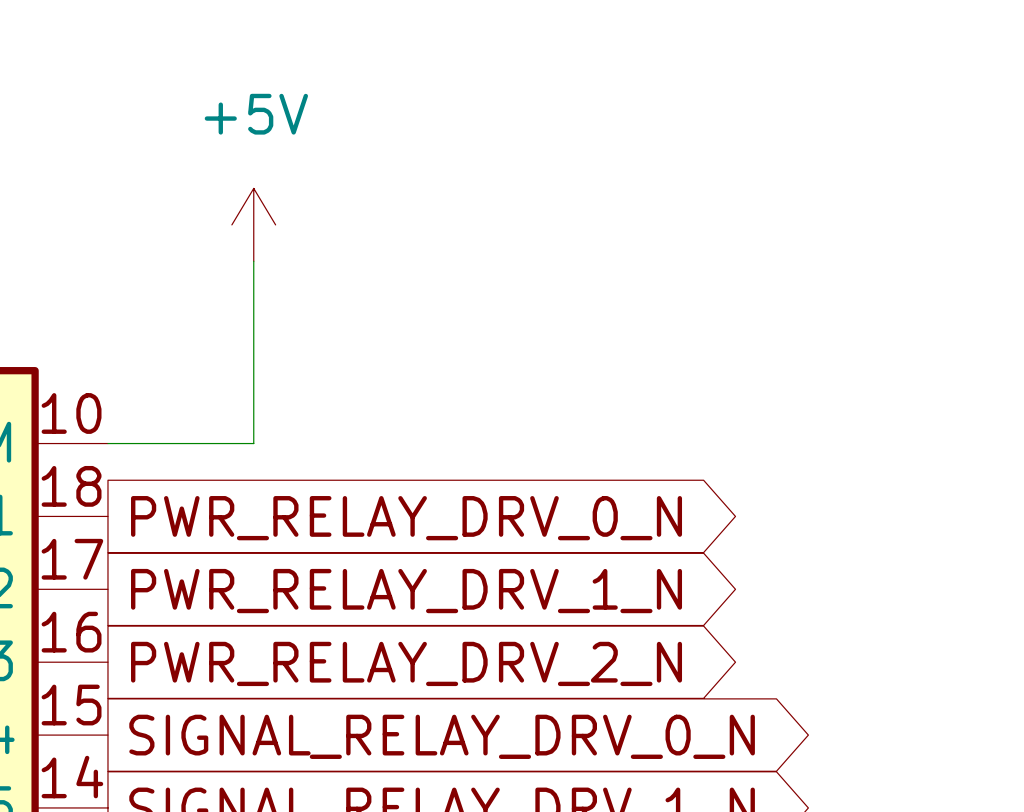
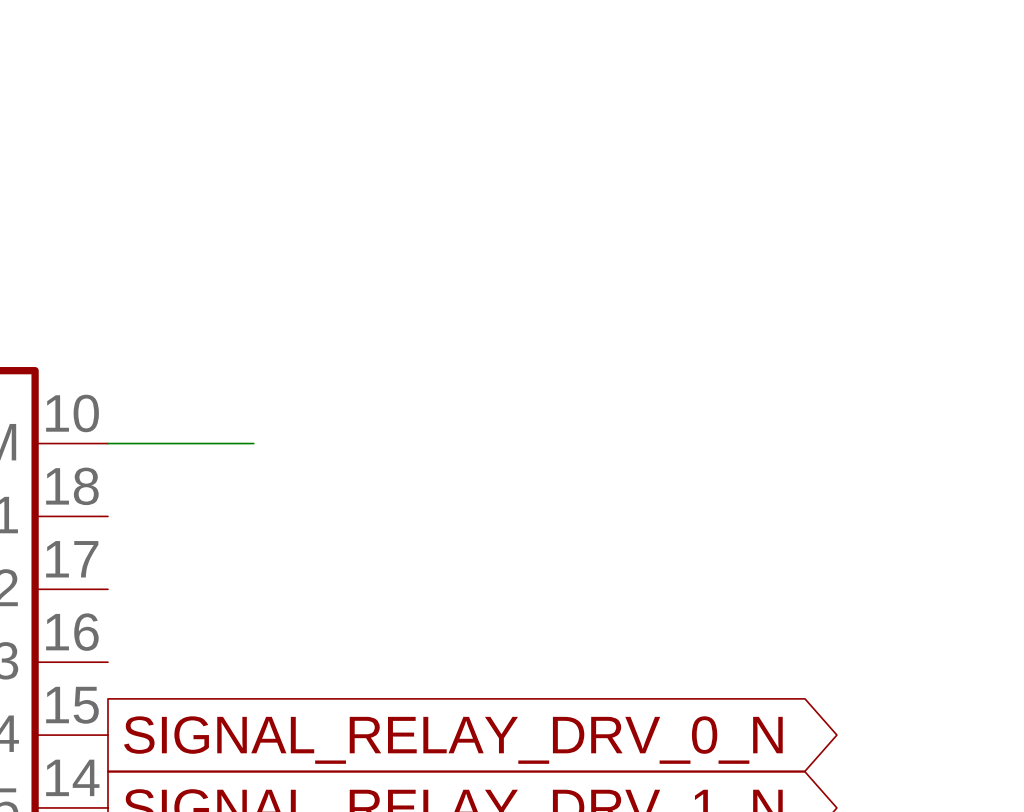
power symbol: +5V (253, 224) -> none
wire: (253, 261) (253, 443) -> none
global label: PWR_RELAY_DRV_0_N (406, 518) -> none
global label: PWR_RELAY_DRV_1_N (406, 591) -> none
global label: PWR_RELAY_DRV_2_N (406, 663) -> none

